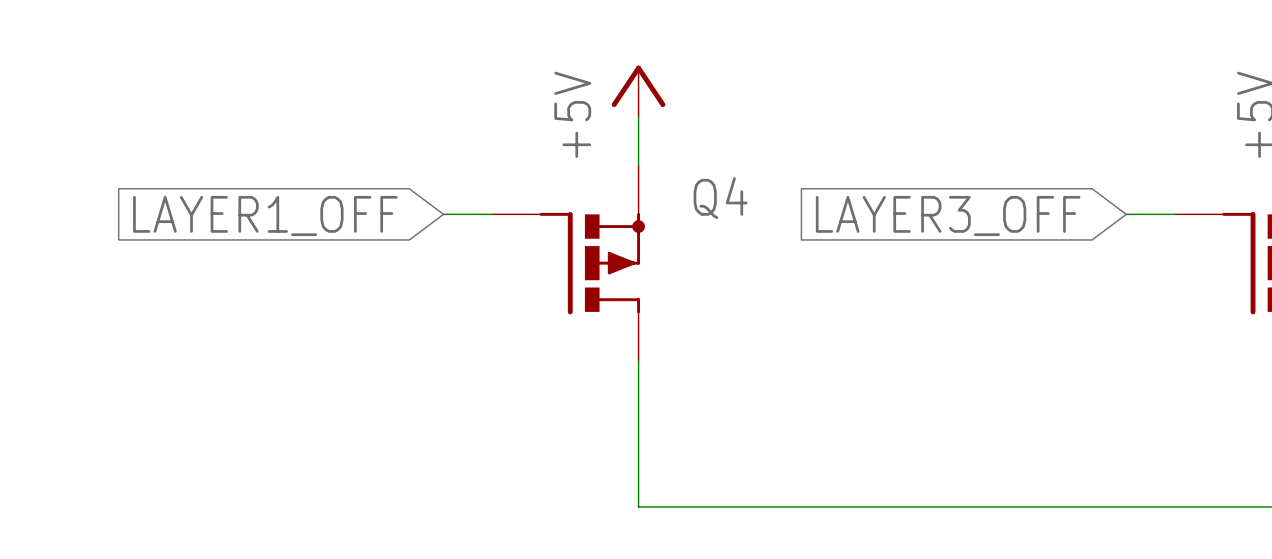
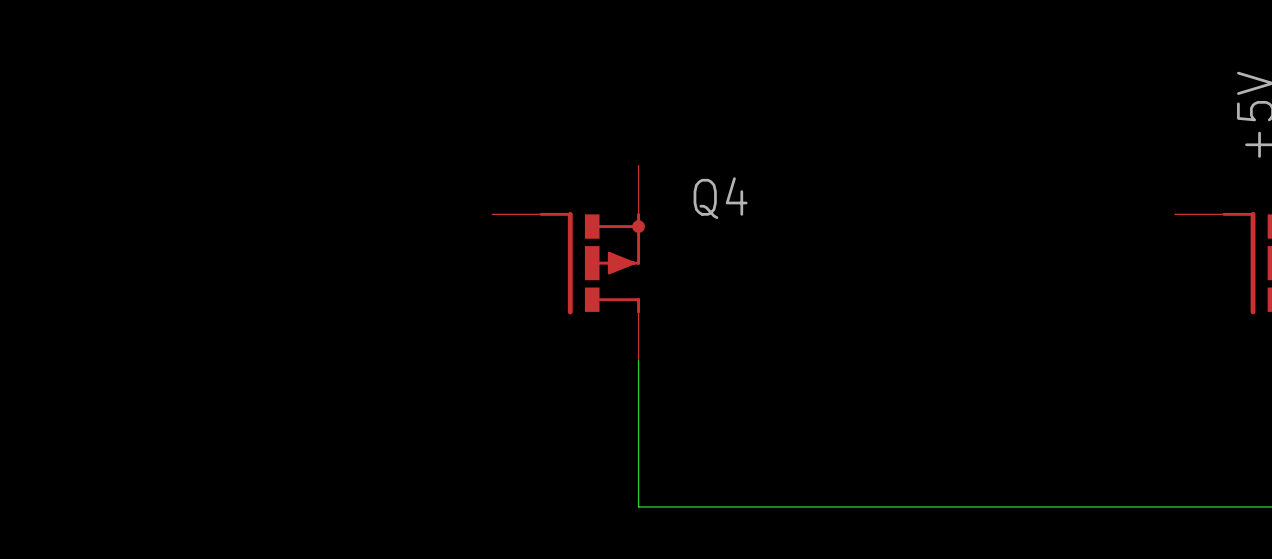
power symbol: +5V (638, 91) -> none
wire: (638, 116) (638, 165) -> none
wire: (443, 214) (492, 214) -> none
wire: (1126, 214) (1175, 214) -> none
global label: LAYER1_OFF (265, 215) -> none
global label: LAYER3_OFF (948, 215) -> none

